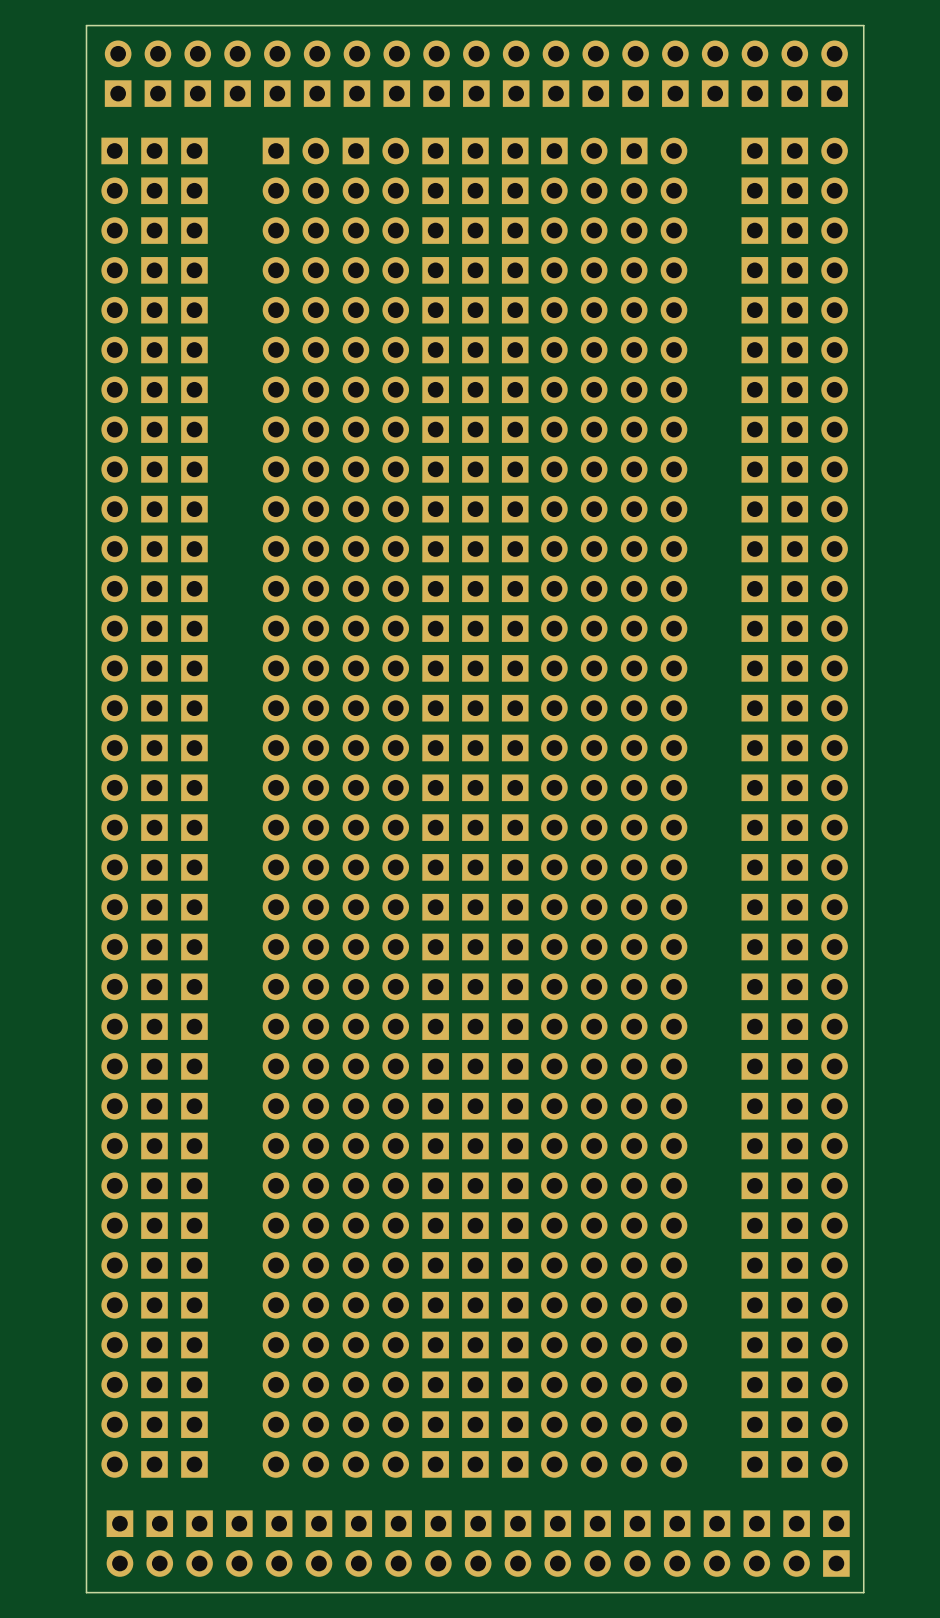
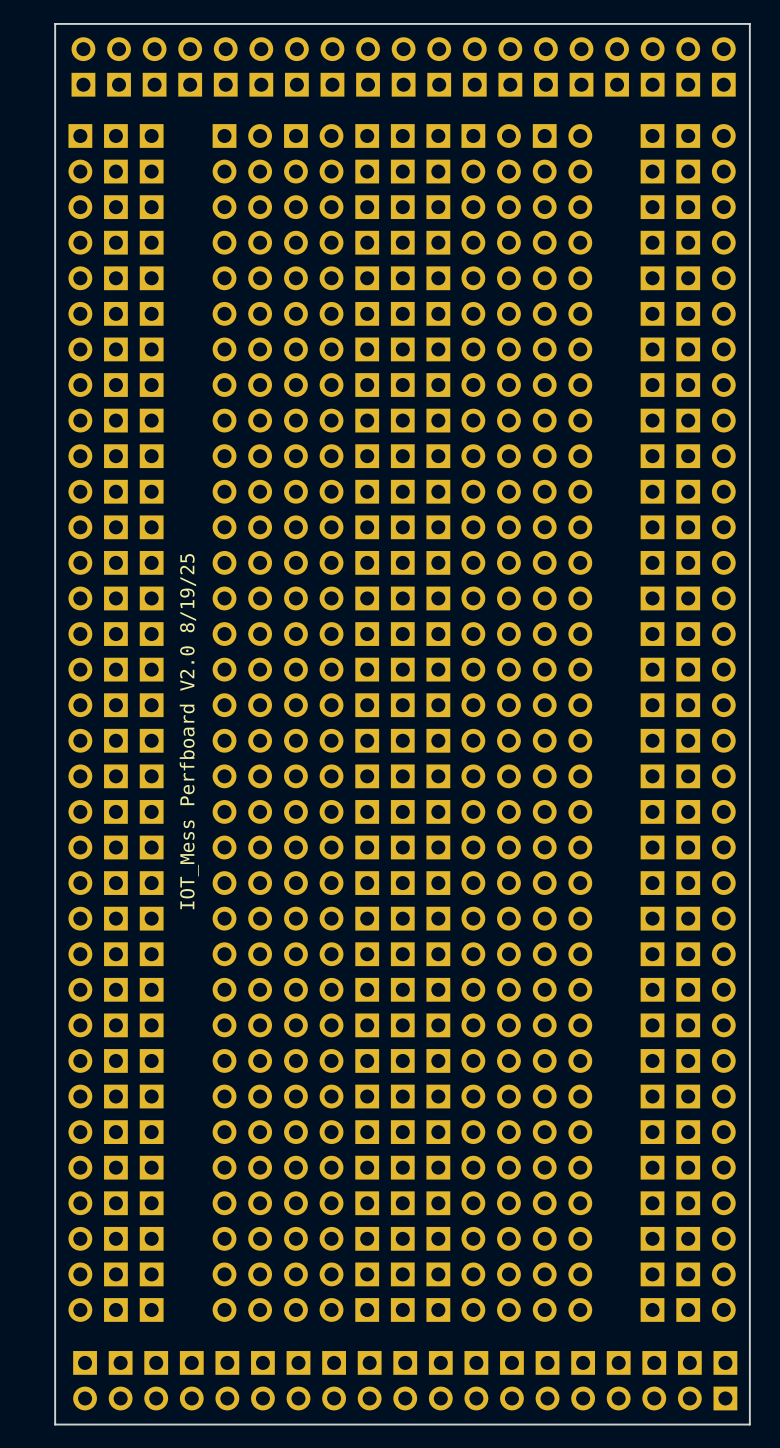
text: none -> IOT_Mess Perfboard V2.0 8/19/25 (189, 731)

